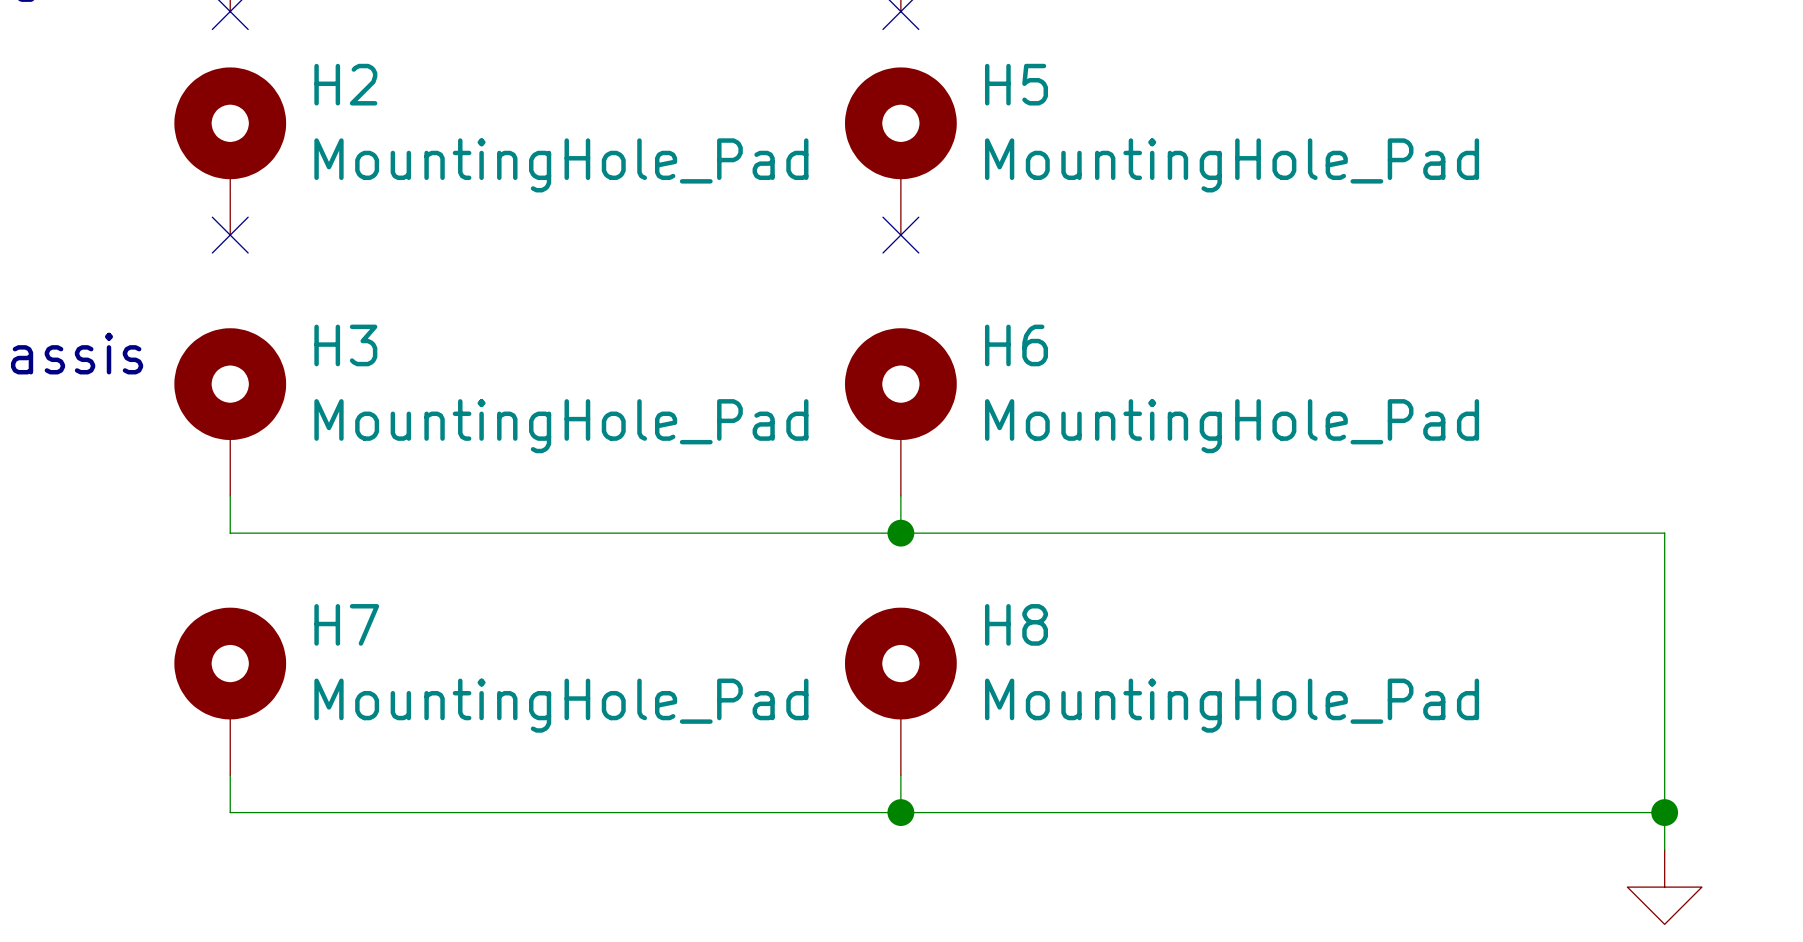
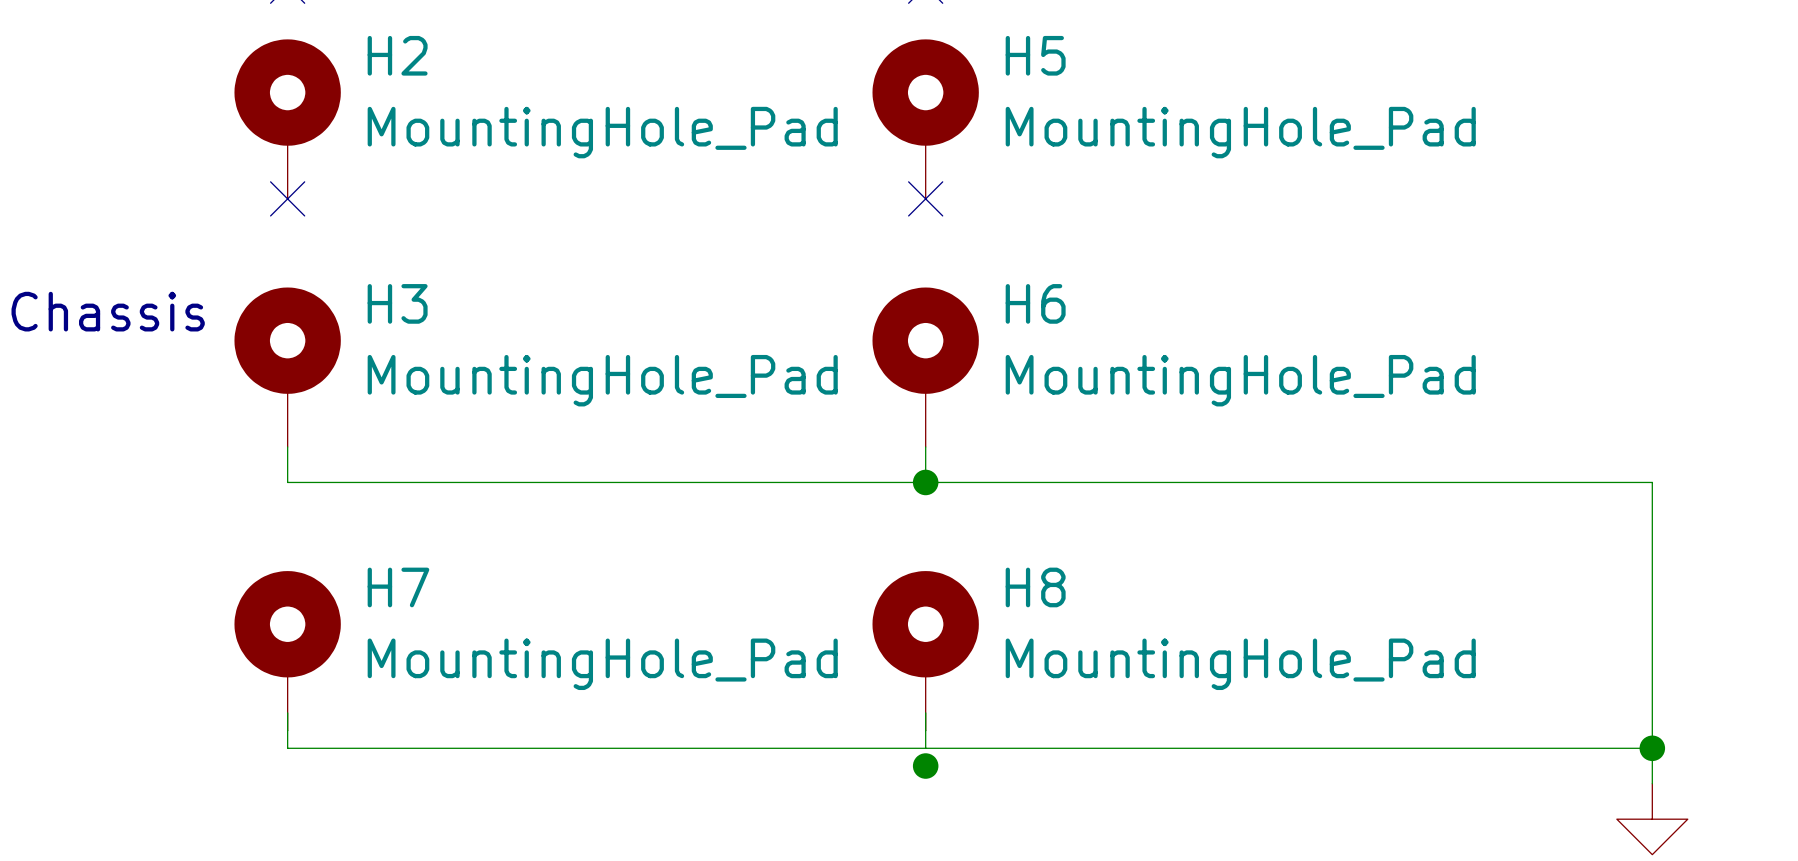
H7 position: (230, 691) -> (287, 650)
H8 position: (900, 691) -> (925, 650)
junction position: (900, 812) -> (925, 766)

